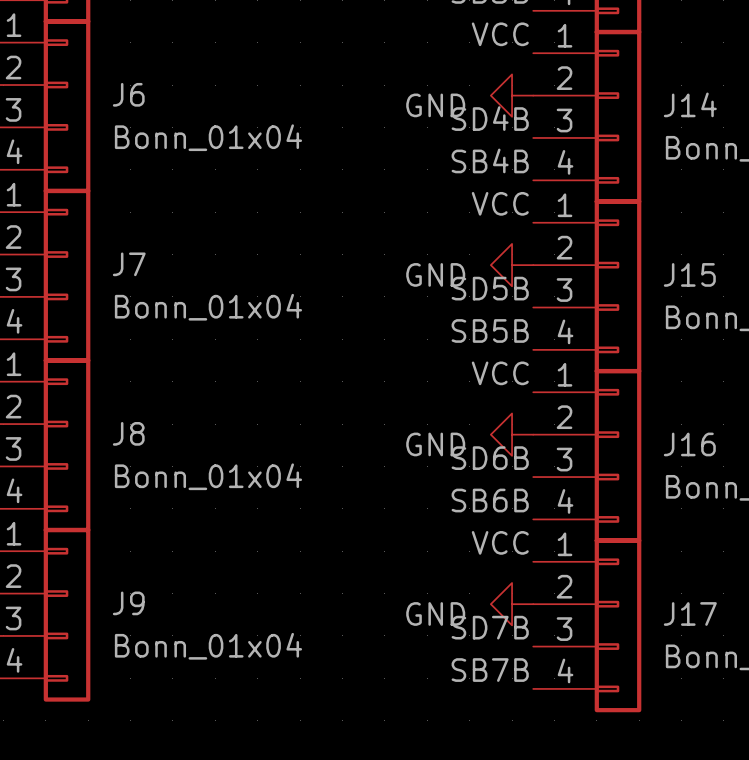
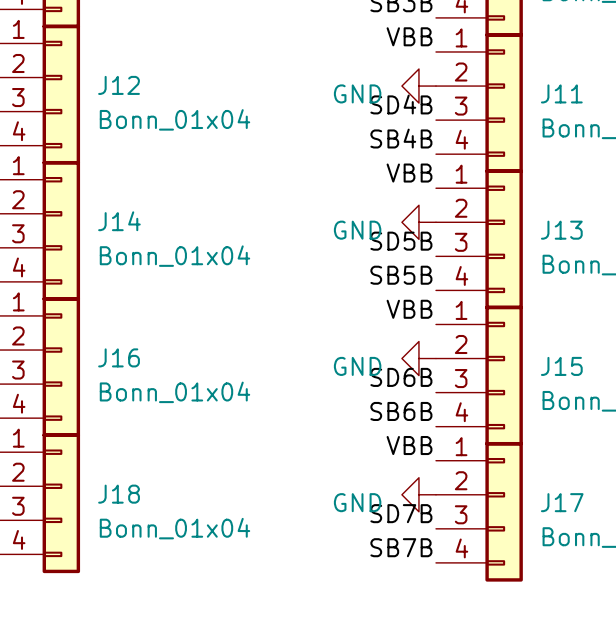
label: VCC (500, 34) -> VBB (409, 36)
J6 name: J6 (128, 94) -> J12 (119, 85)
J14 name: J14 (690, 104) -> J11 (561, 93)
label: VCC (500, 203) -> VBB (409, 173)
J7 name: J7 (129, 264) -> J14 (119, 221)
J15 name: J15 (689, 274) -> J13 (561, 230)
label: VCC (500, 373) -> VBB (409, 309)
J8 name: J8 (128, 433) -> J16 (119, 357)
J16 name: J16 (689, 444) -> J15 (561, 366)
label: VCC (500, 542) -> VBB (409, 445)
J9 name: J9 (128, 603) -> J18 (119, 494)

